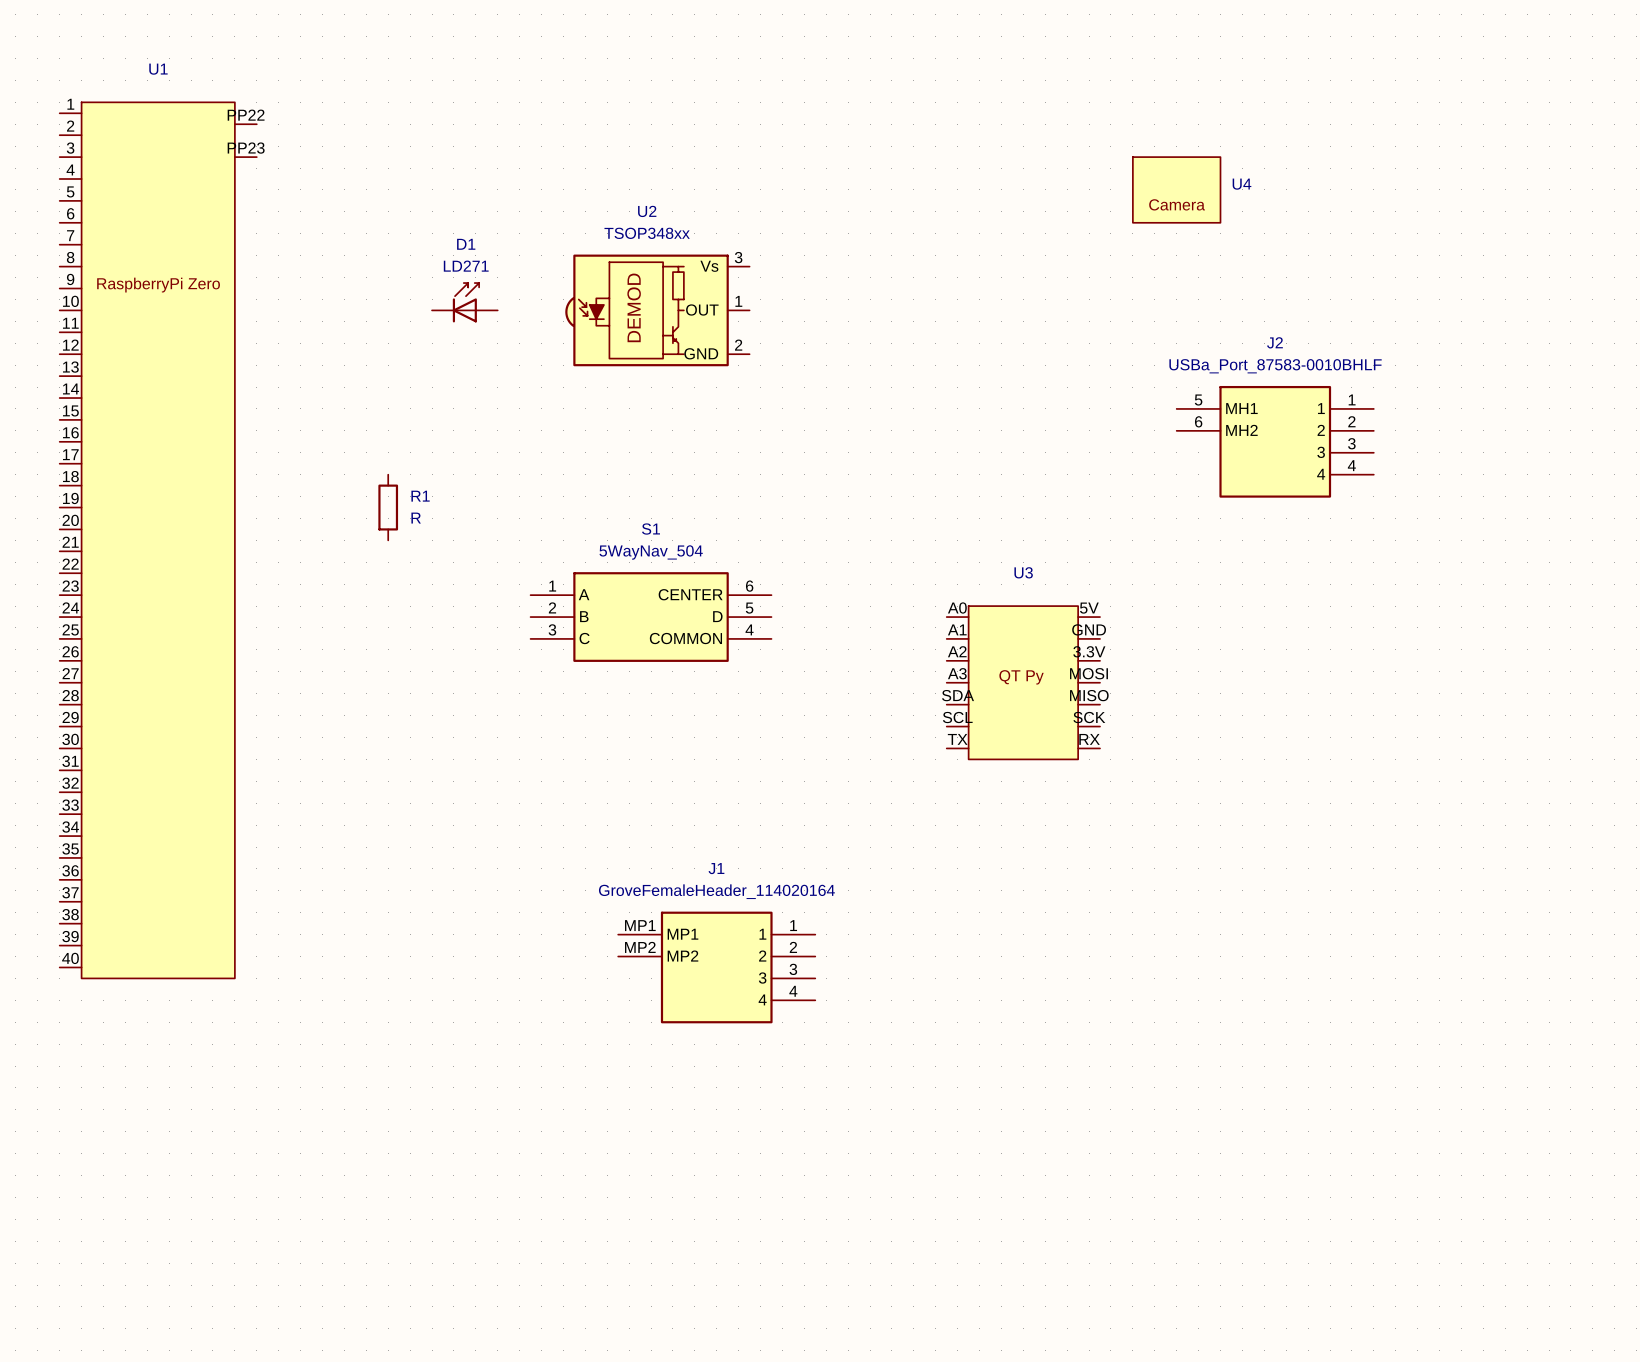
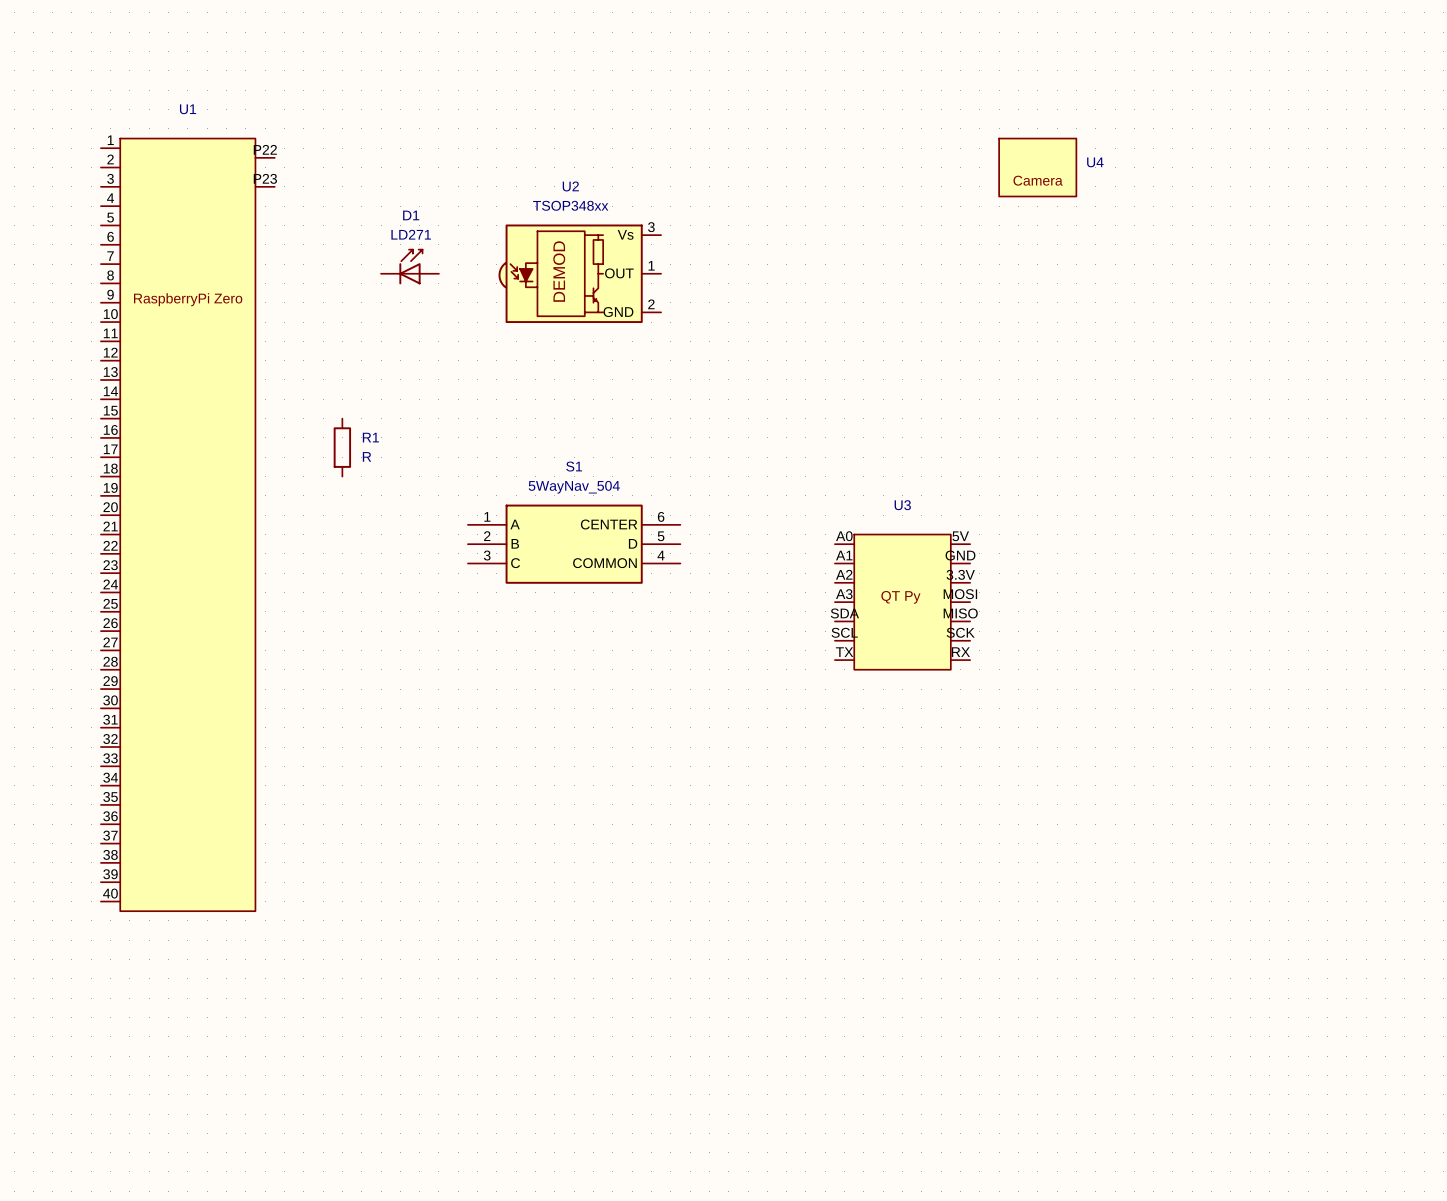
U1 pin number: PP22 (246, 115) -> P22 (265, 149)
U1 pin number: PP23 (246, 148) -> P23 (265, 178)
J2: USBa_Port_87583-0010BHLF (1275, 441) -> none
U1 position: (158, 540) -> (187, 524)
J1: GroveFemaleHeader_114020164 (716, 967) -> none

